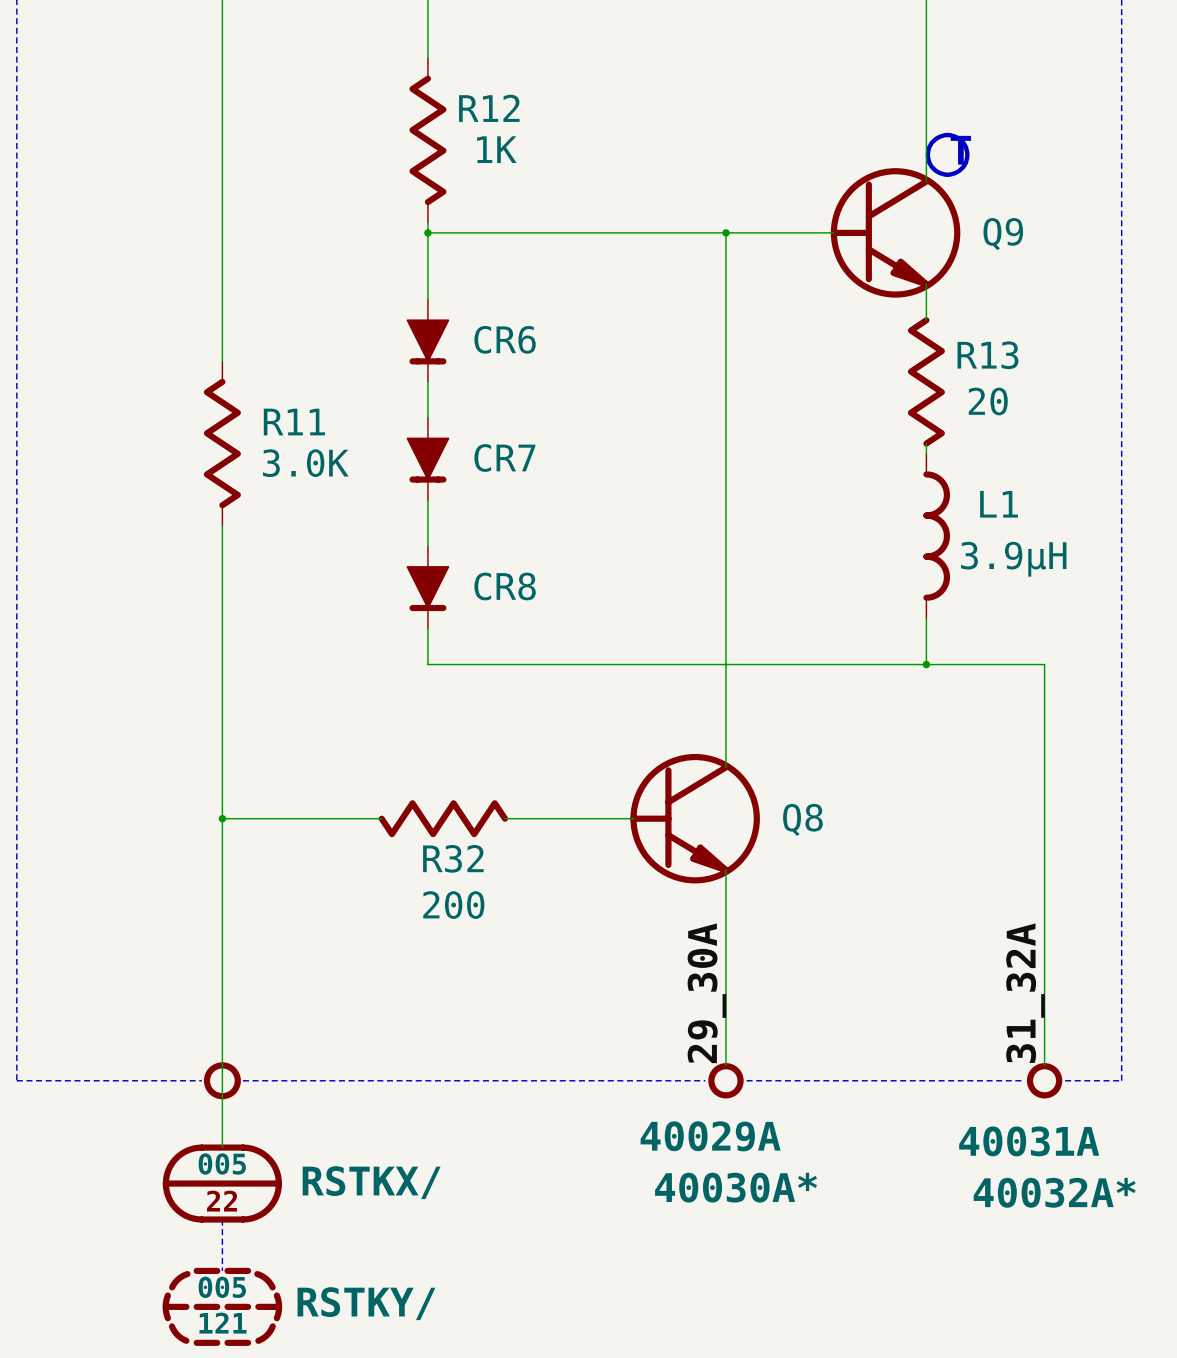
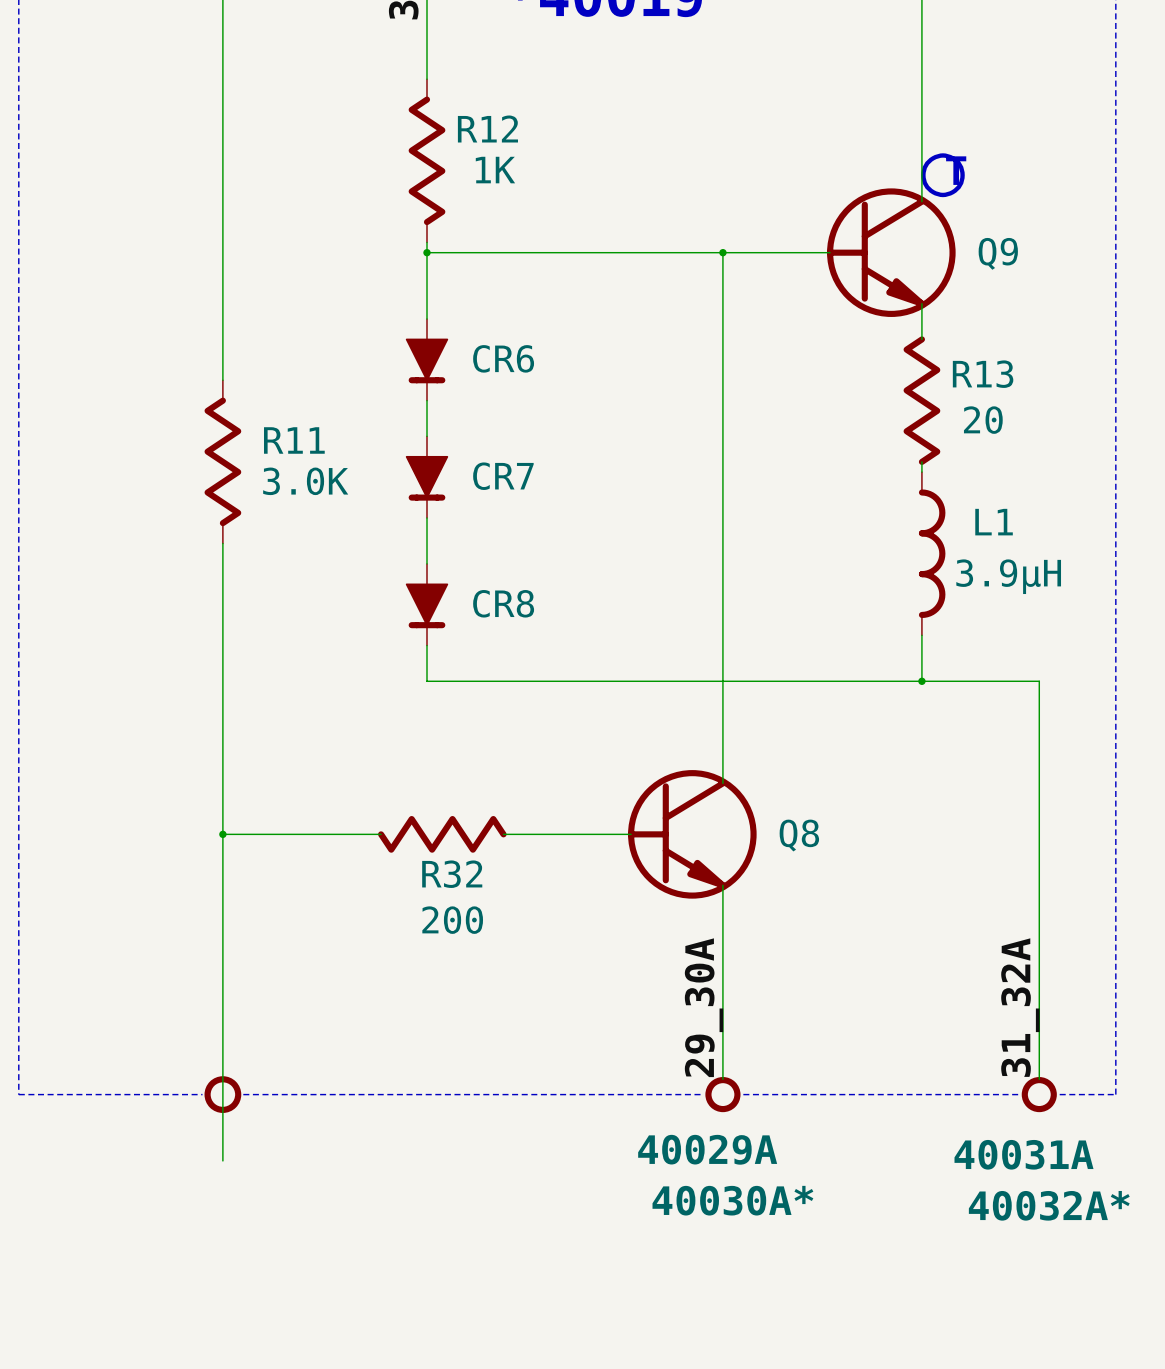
part: (222, 1183) -> none
line: (222, 1219) (222, 1270) -> none
part: (222, 1306) -> none

